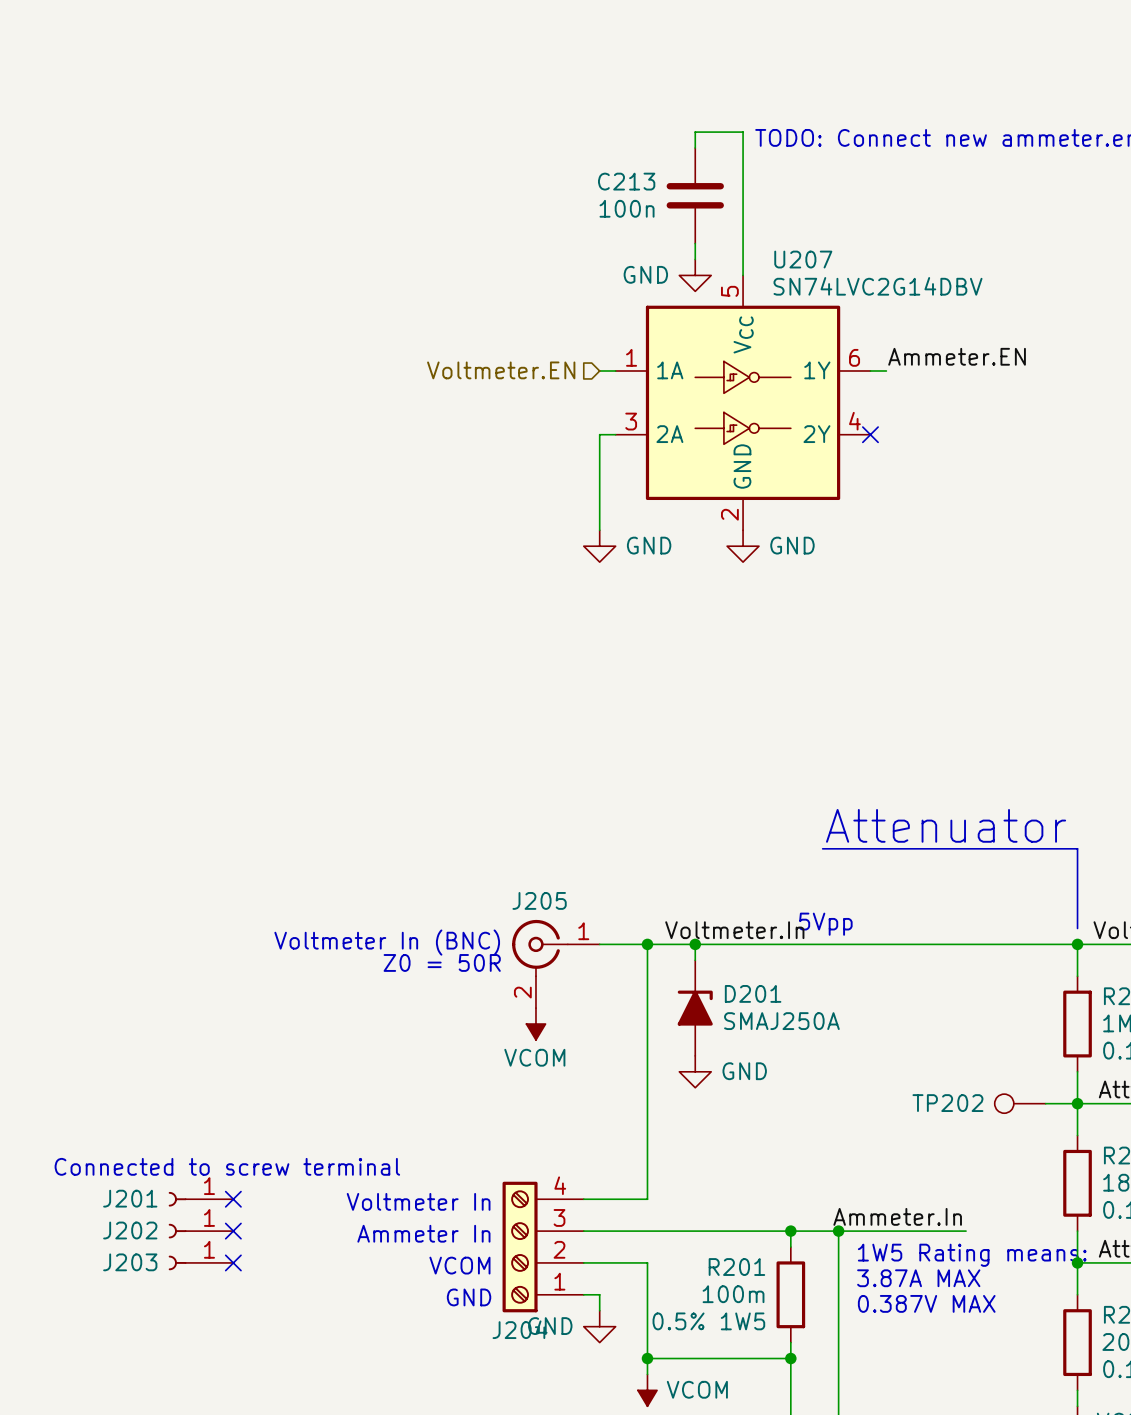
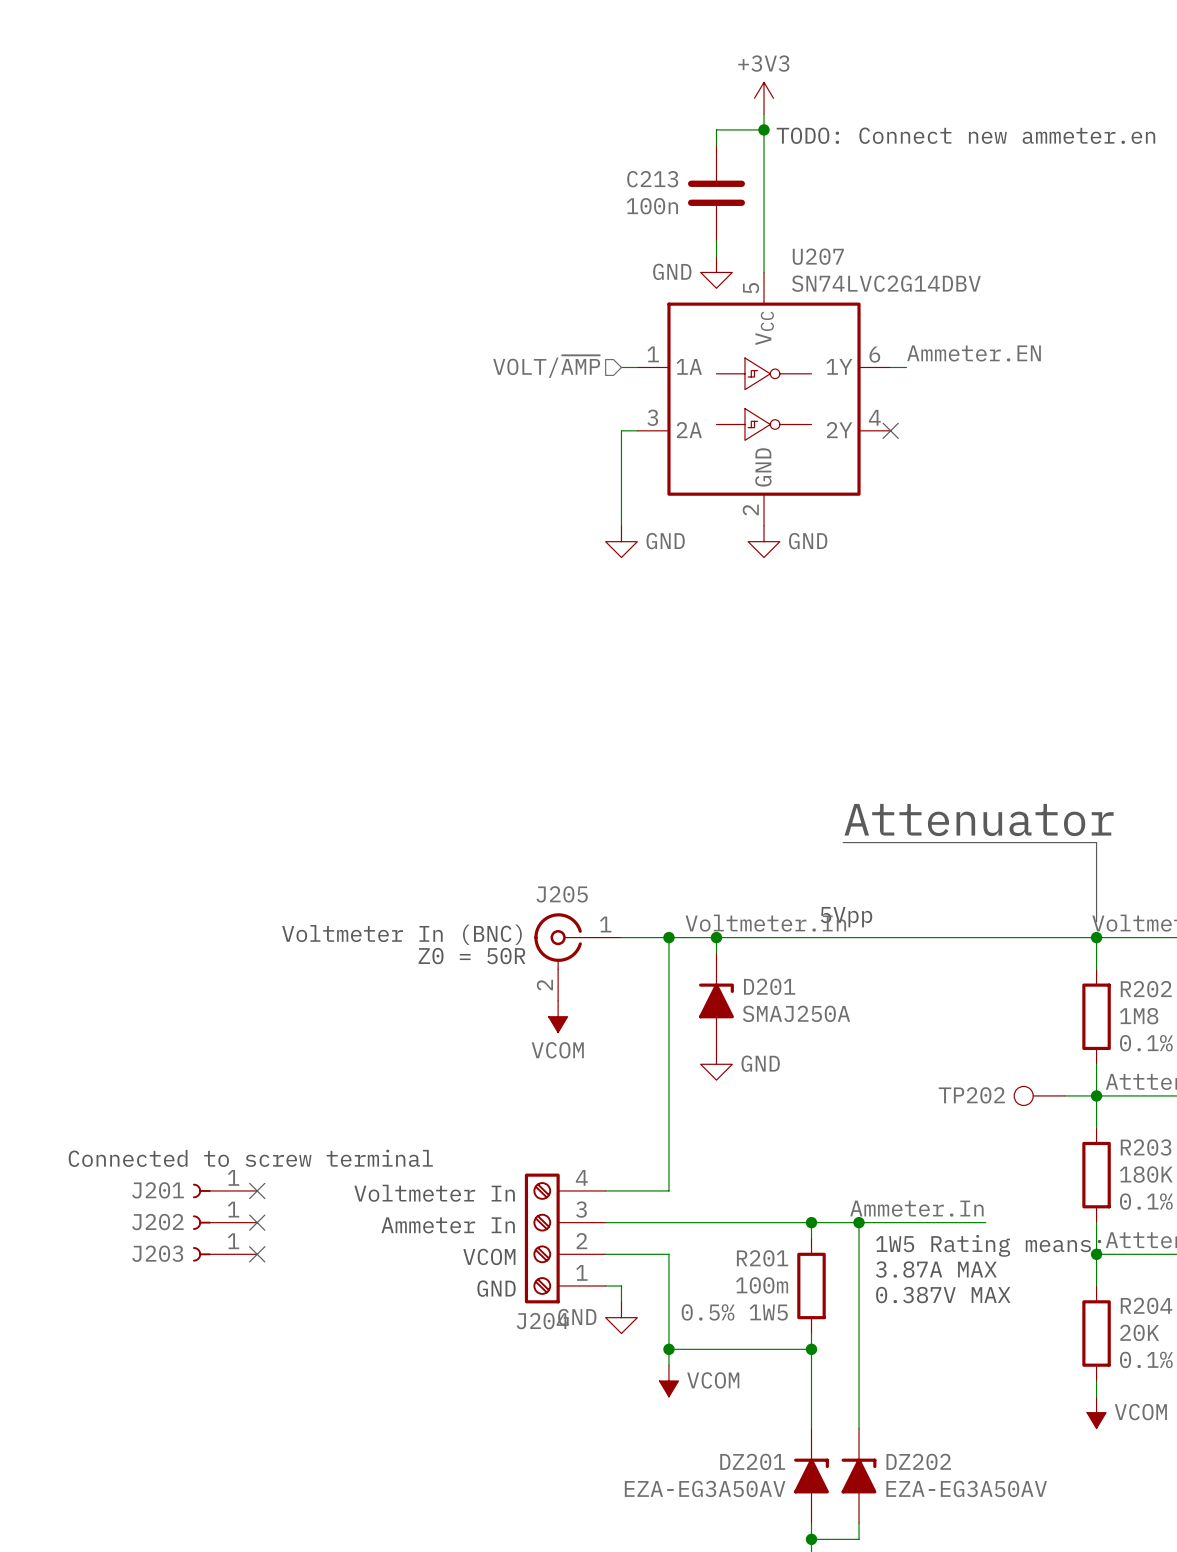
power symbol: none -> +3V3 (763, 98)
wire: none -> (763, 114) (763, 129)
junction: none -> (763, 129)
hierarchical label: Voltmeter.EN (501, 370) -> VOLT/~{AMP} (546, 366)

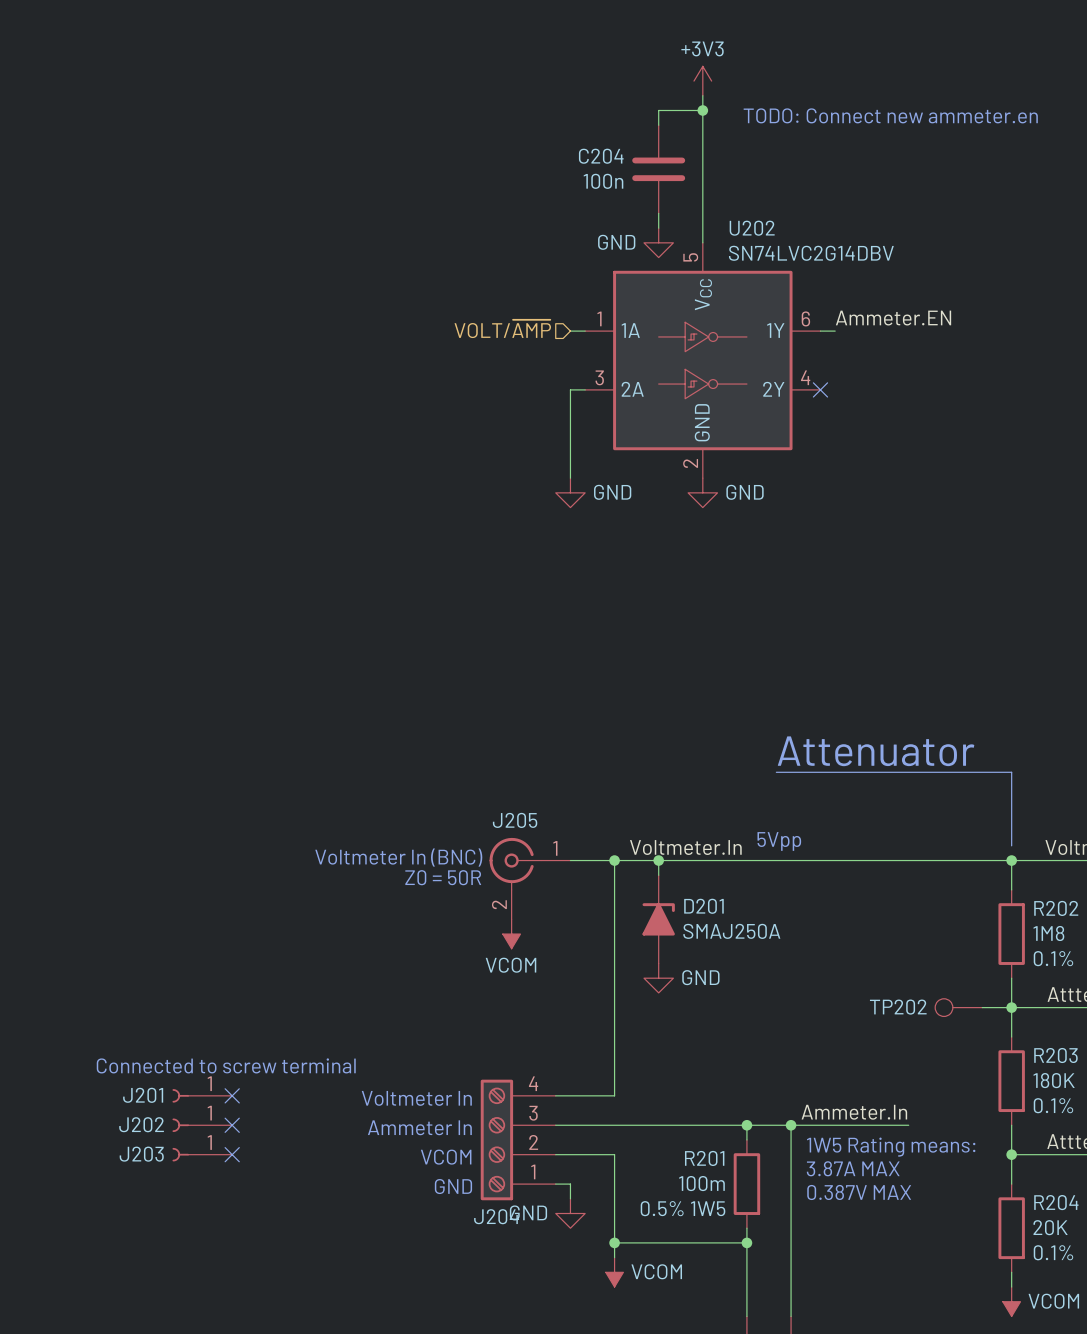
C213 name: C213 (652, 179) -> C204 (601, 156)
U207 name: U207 (818, 256) -> U202 (752, 228)

